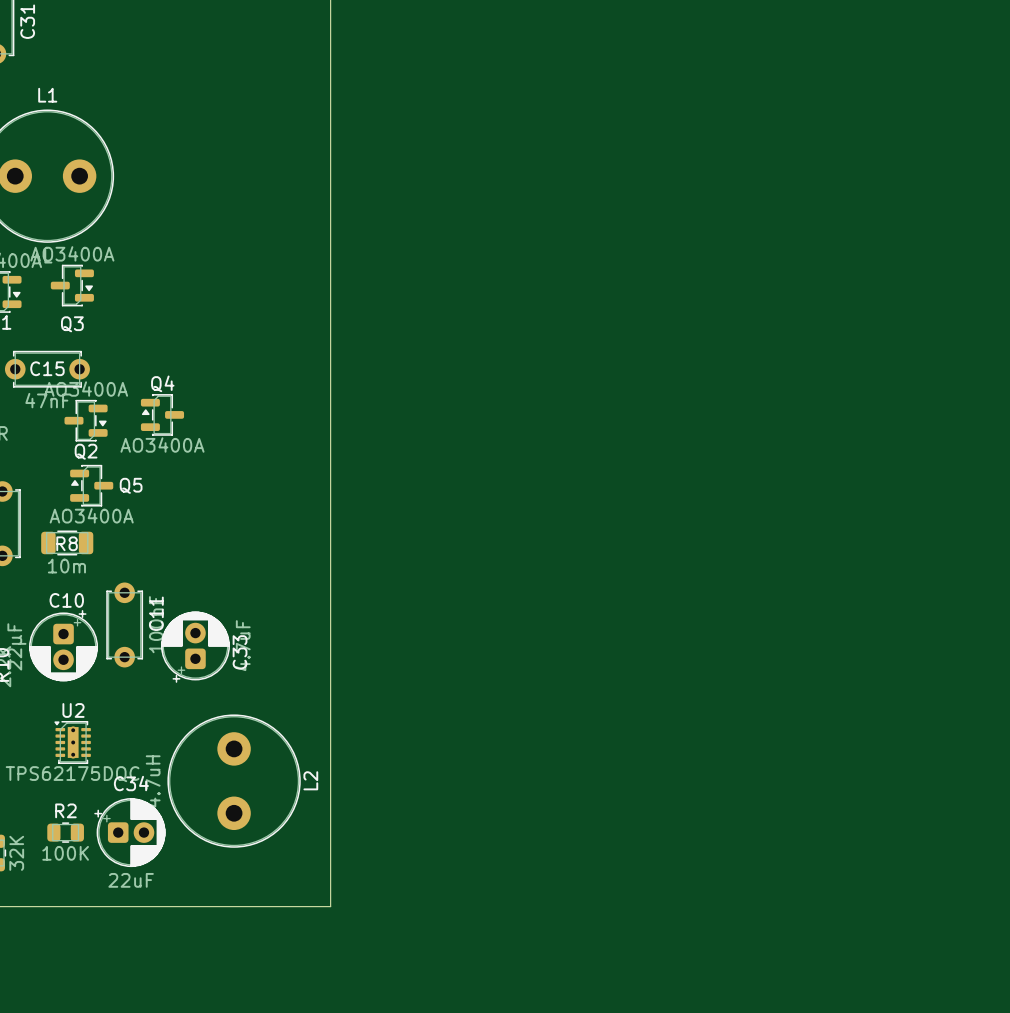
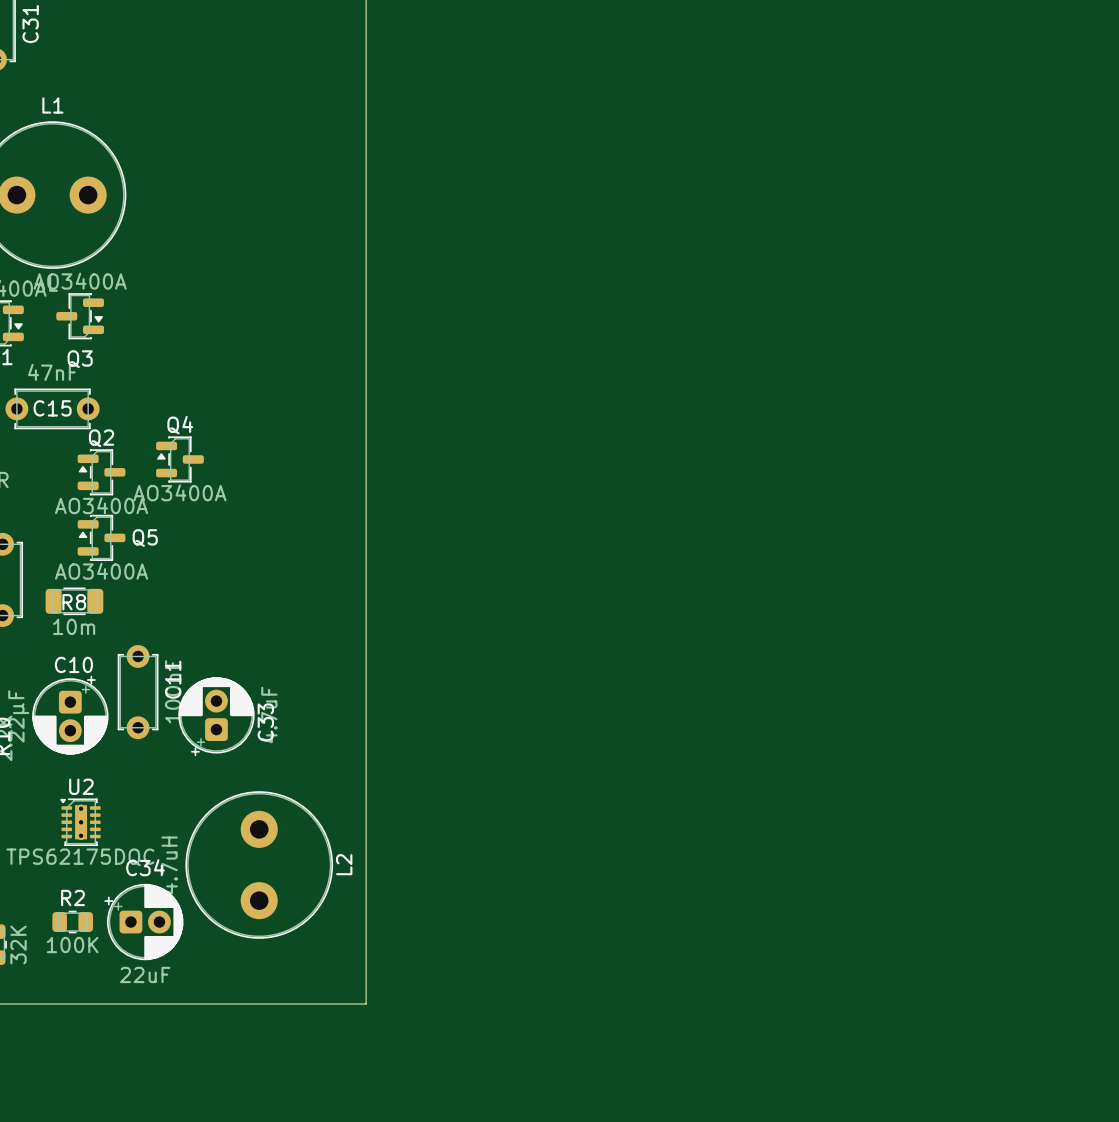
C15 value position: 47nF (47, 400) -> 47nF (52, 372)
Q2 rotation: 0° (86, 420) -> 180° (101, 472)

